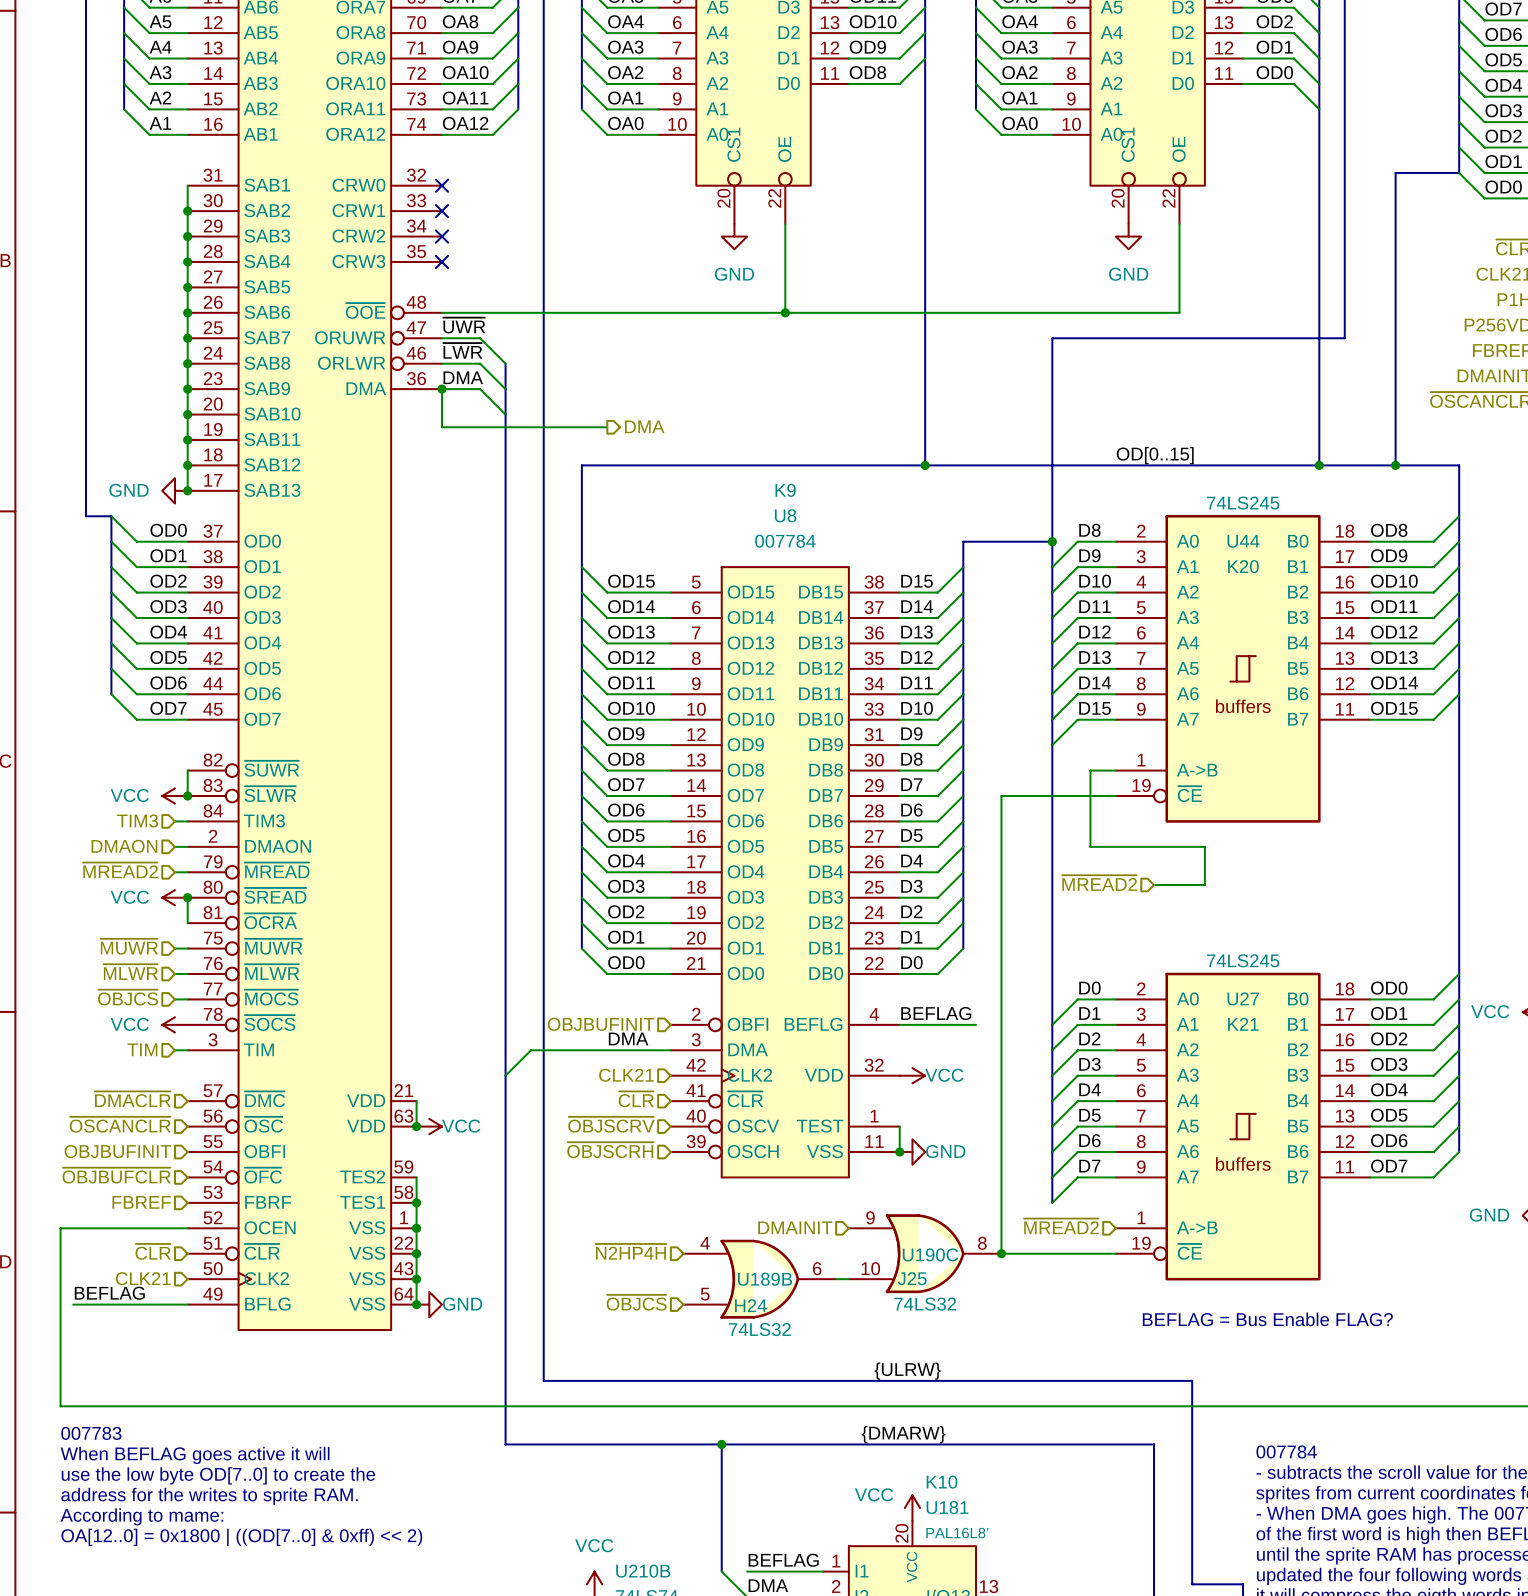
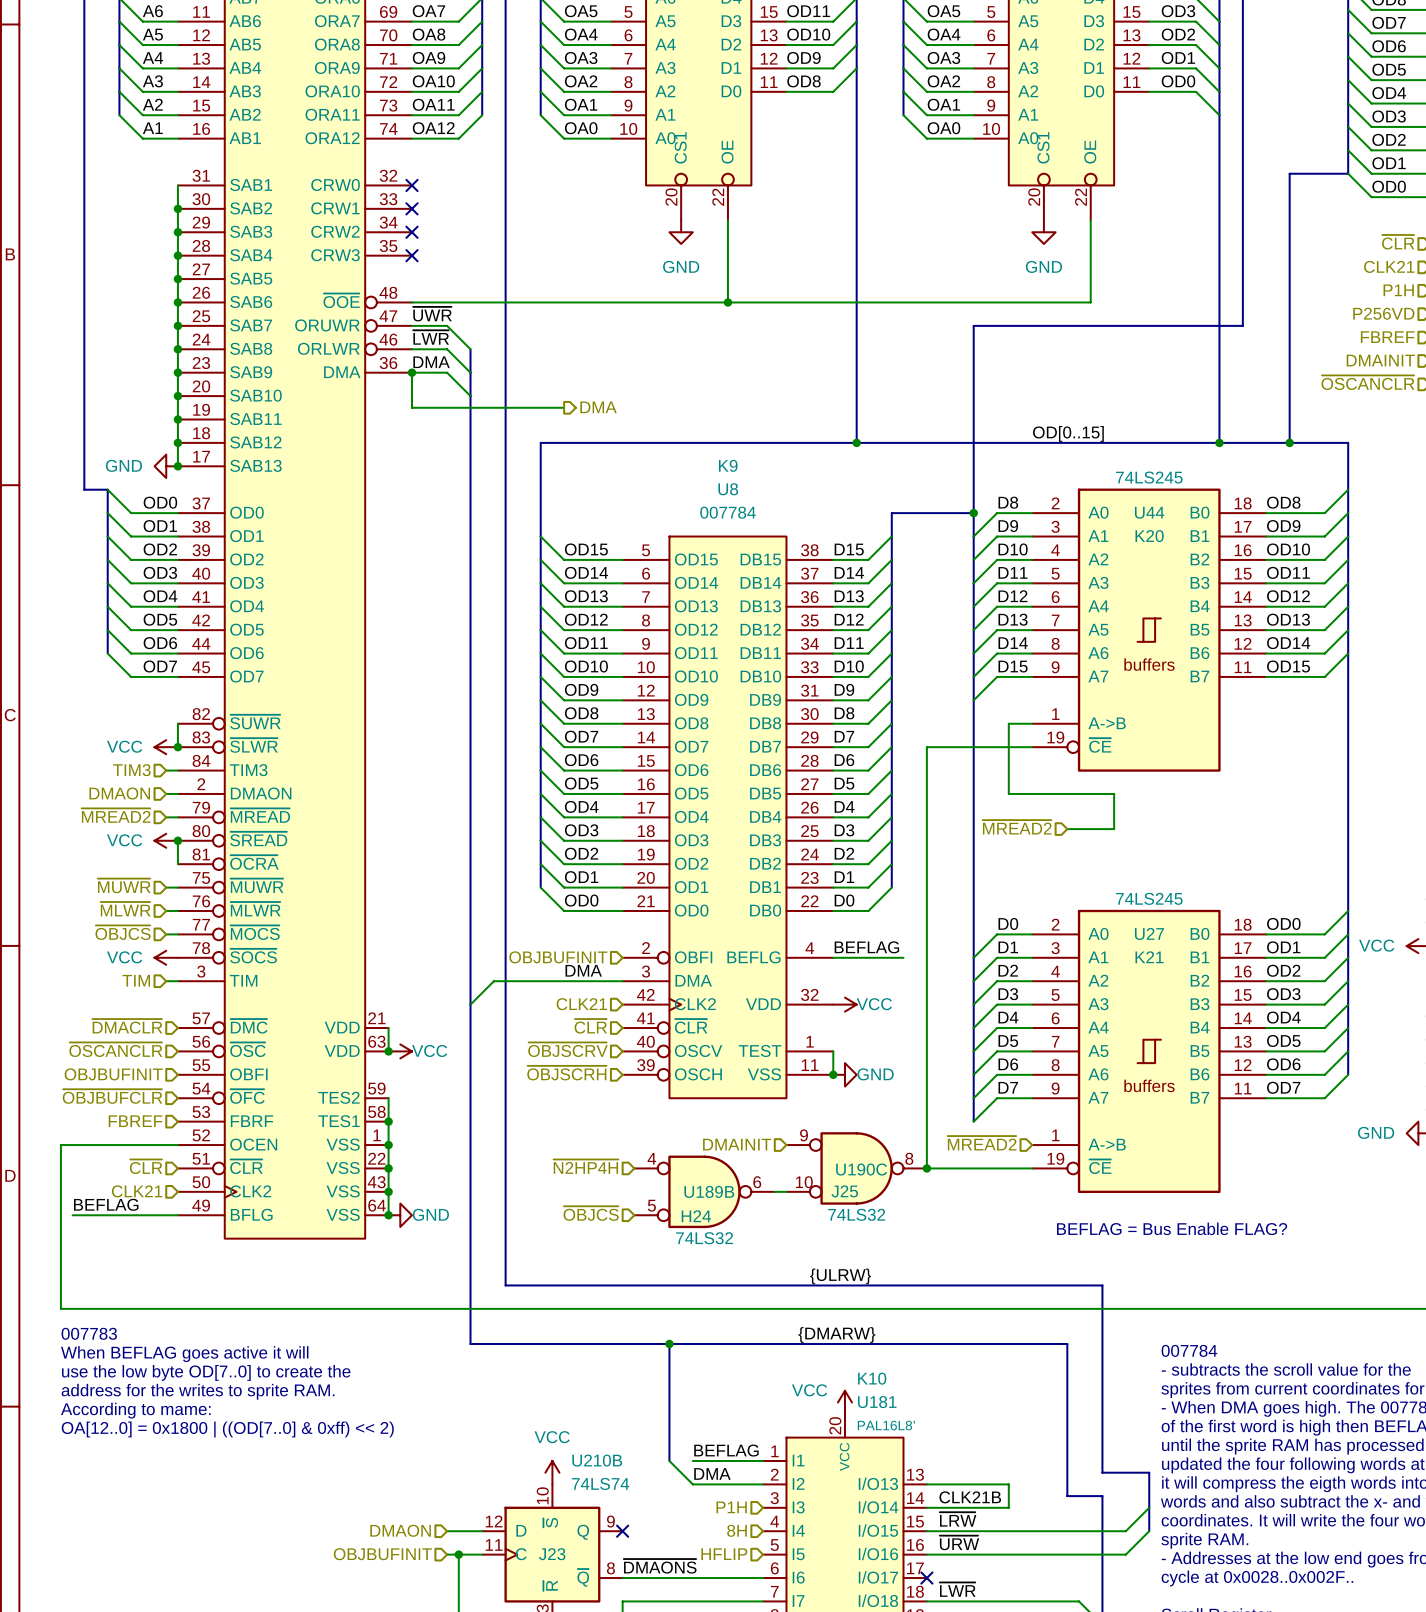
U190C symbol: [848, 1214, 1002, 1294] -> [786, 1132, 927, 1205]
U189B symbol: [683, 1239, 837, 1319] -> [634, 1155, 775, 1229]

